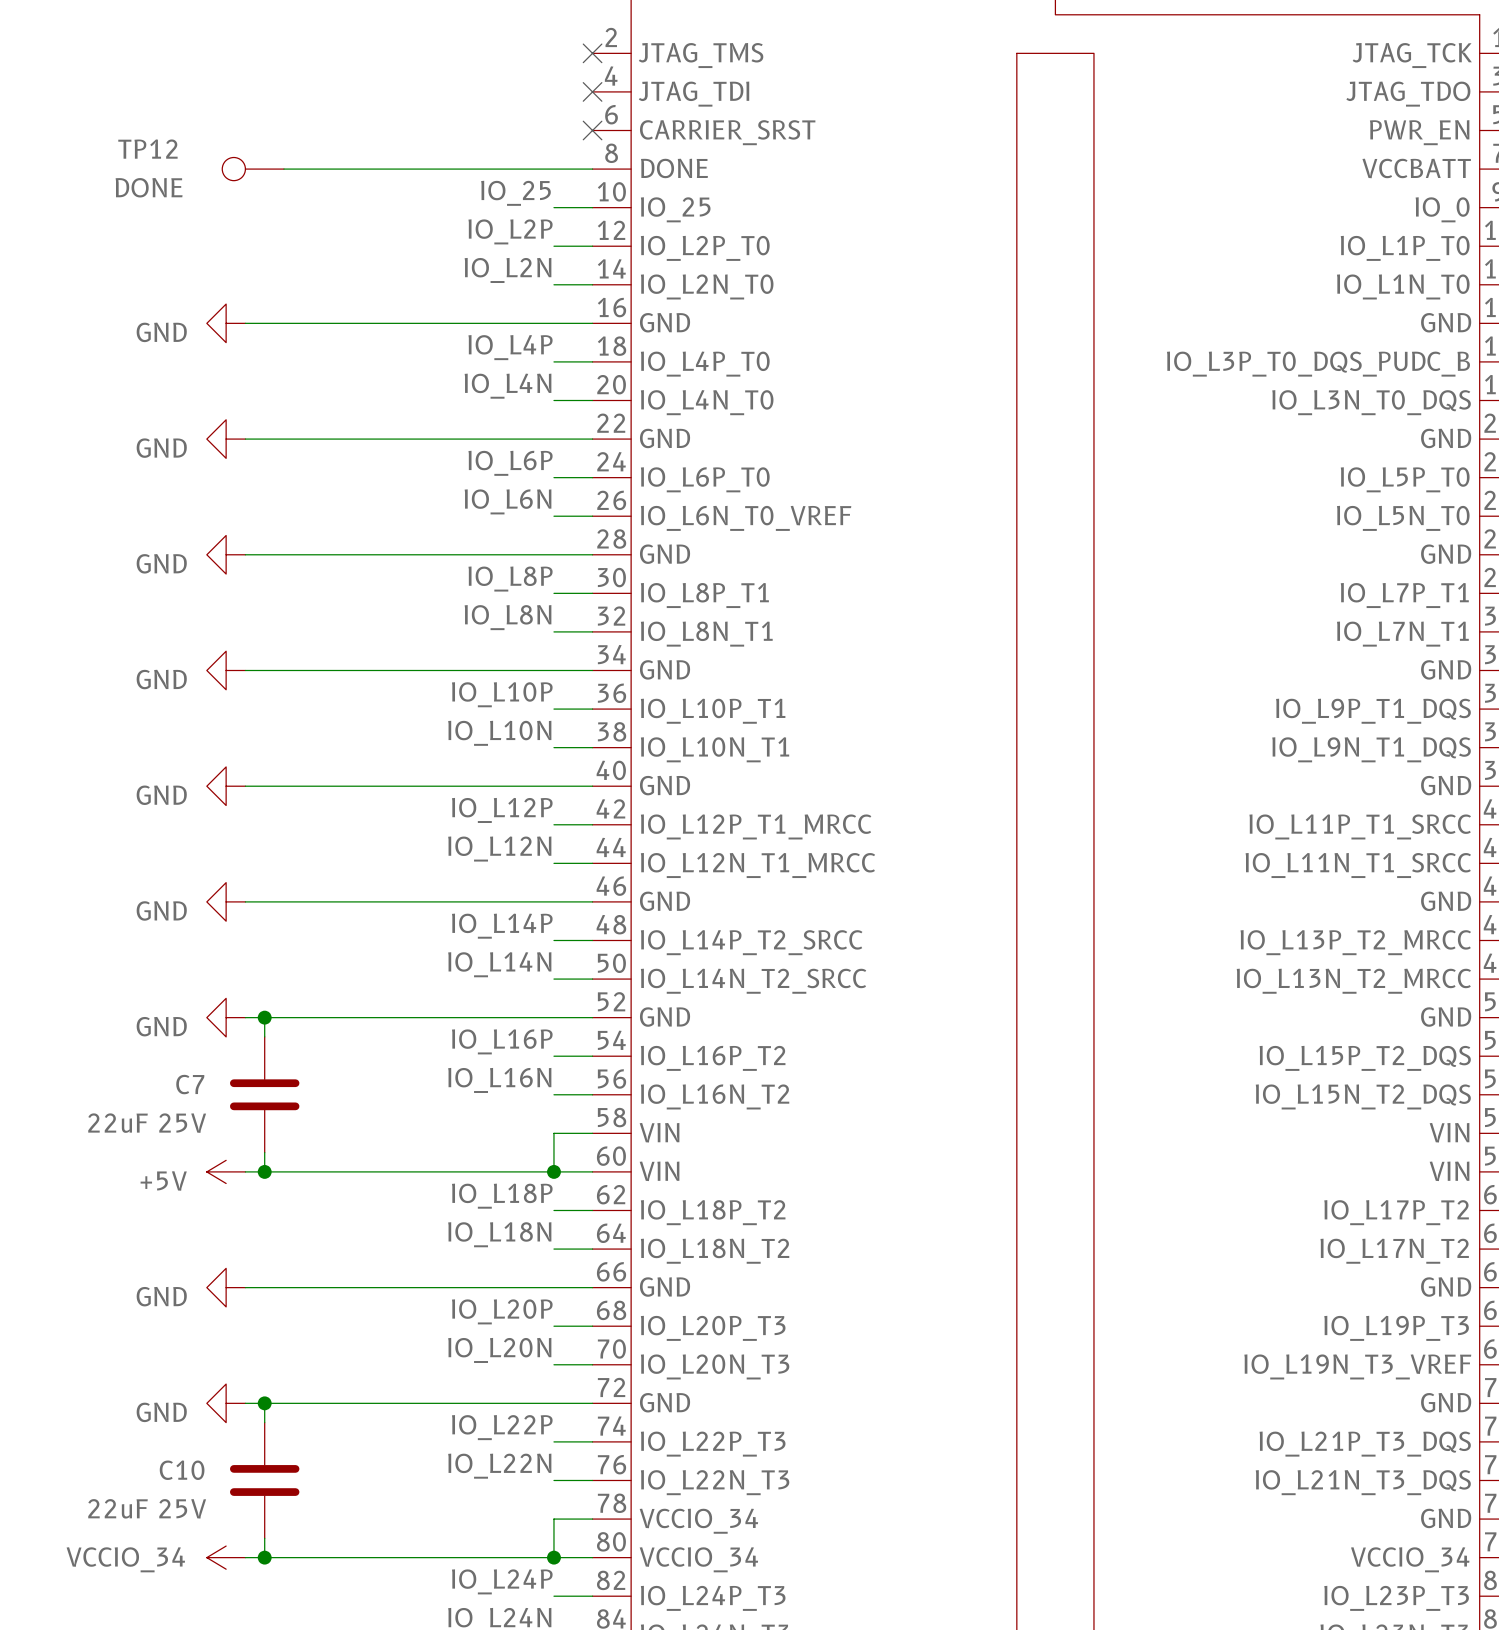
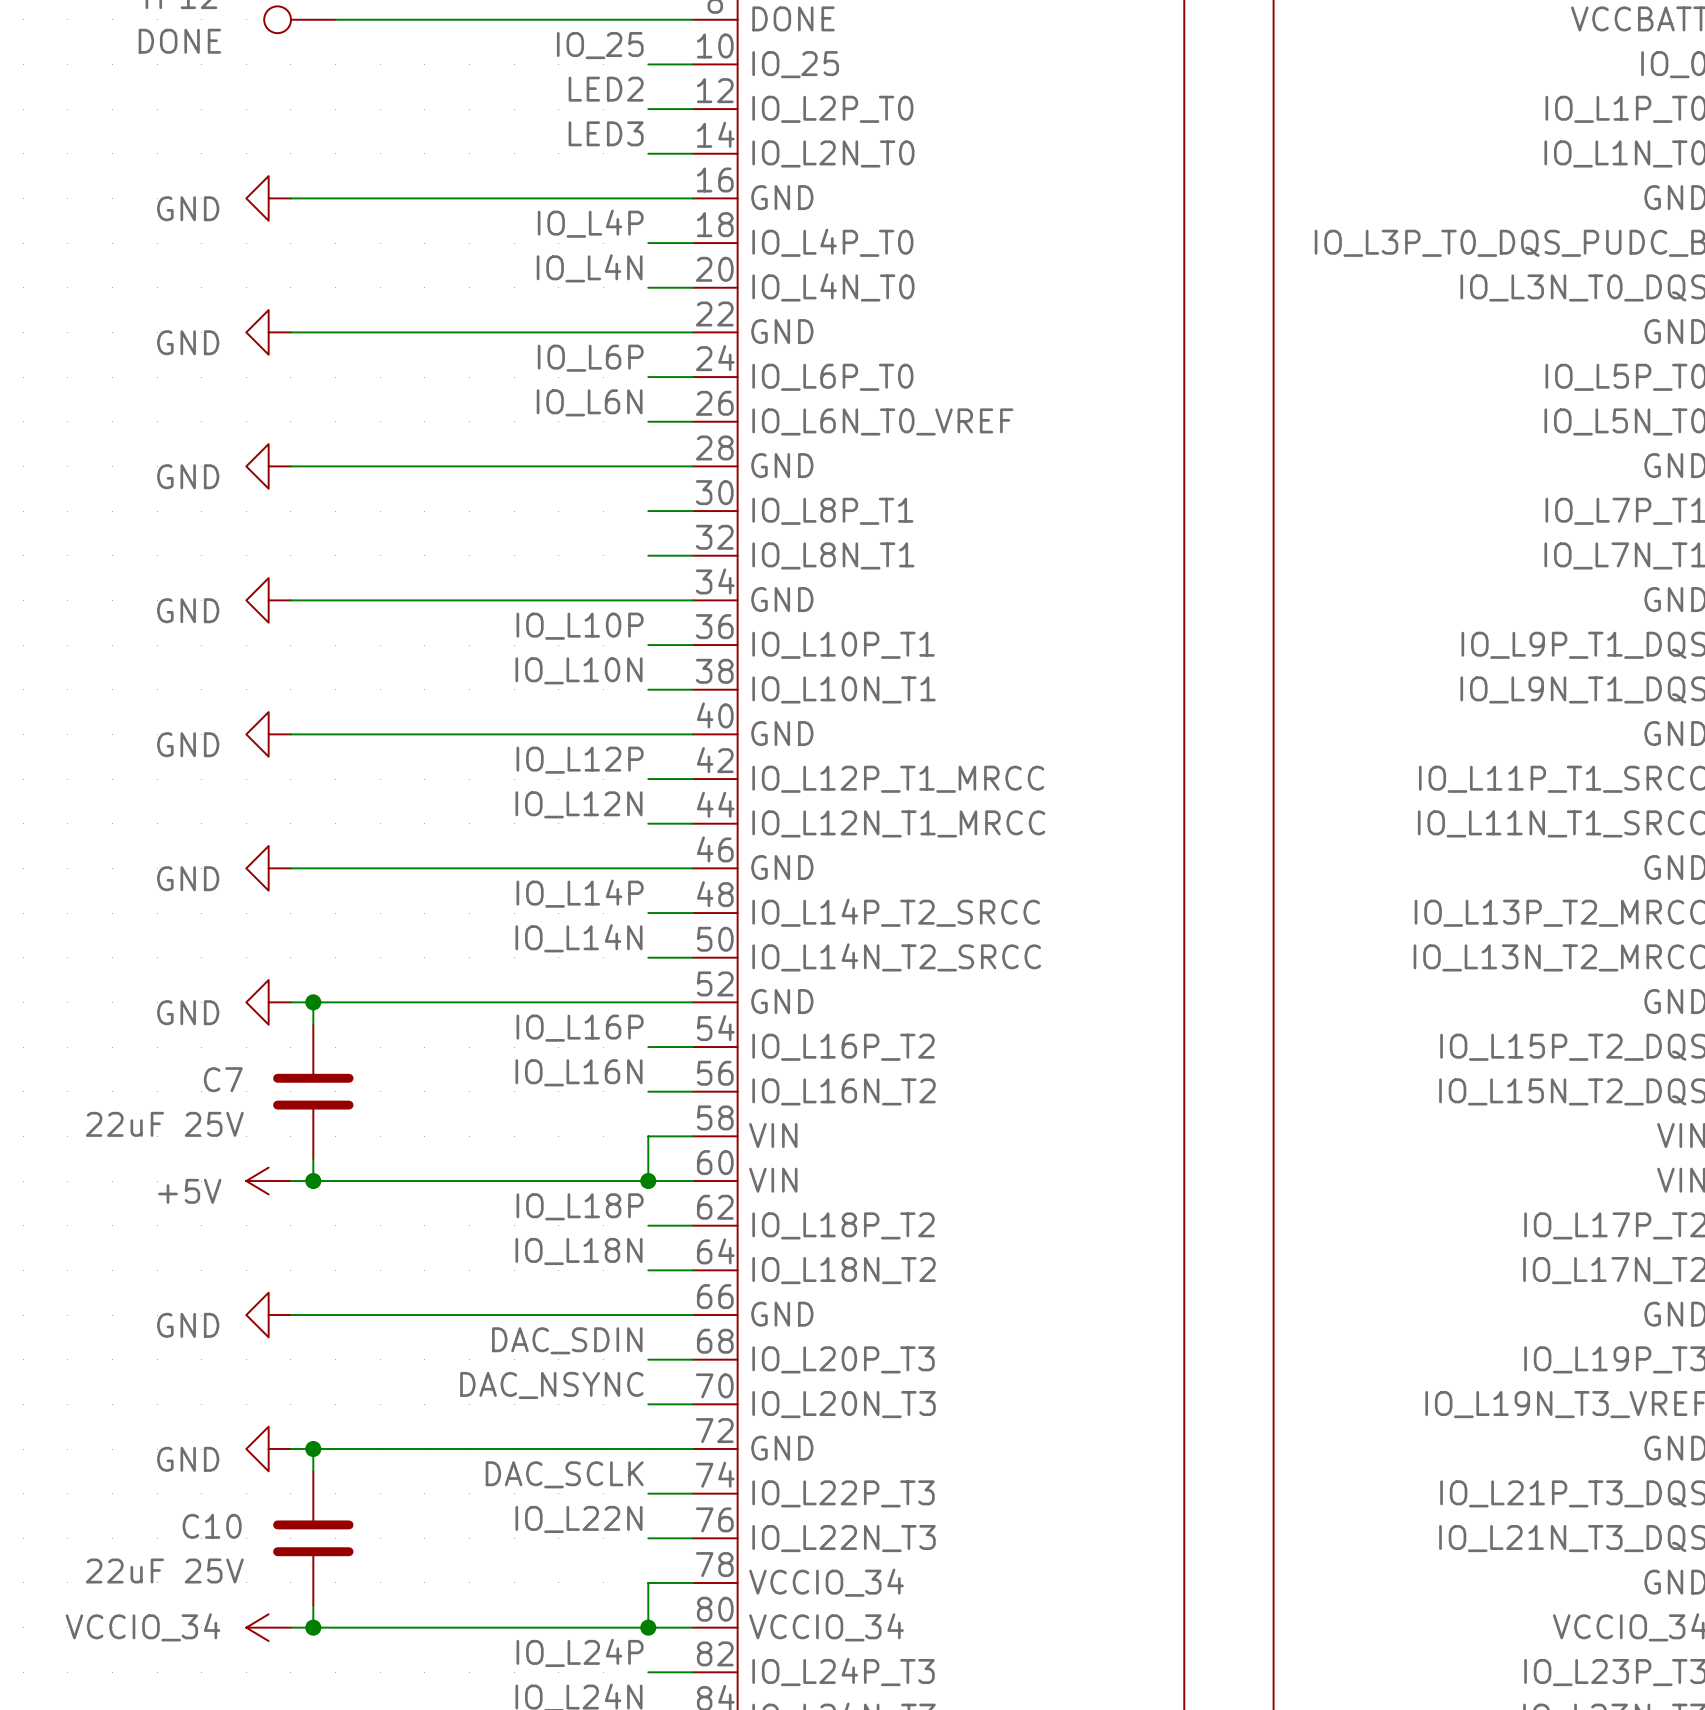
label: IO_L2P (510, 231) -> LED2 (606, 89)
label: IO_L2N (508, 270) -> LED3 (606, 133)
label: IO_L8P (510, 579) -> none
label: IO_L8N (508, 617) -> none
label: IO_L20P (502, 1311) -> DAC_SDIN (567, 1340)
label: IO_L20N (499, 1350) -> DAC_NSYNC (551, 1385)
label: IO_L22P (502, 1427) -> DAC_SCLK (564, 1474)

